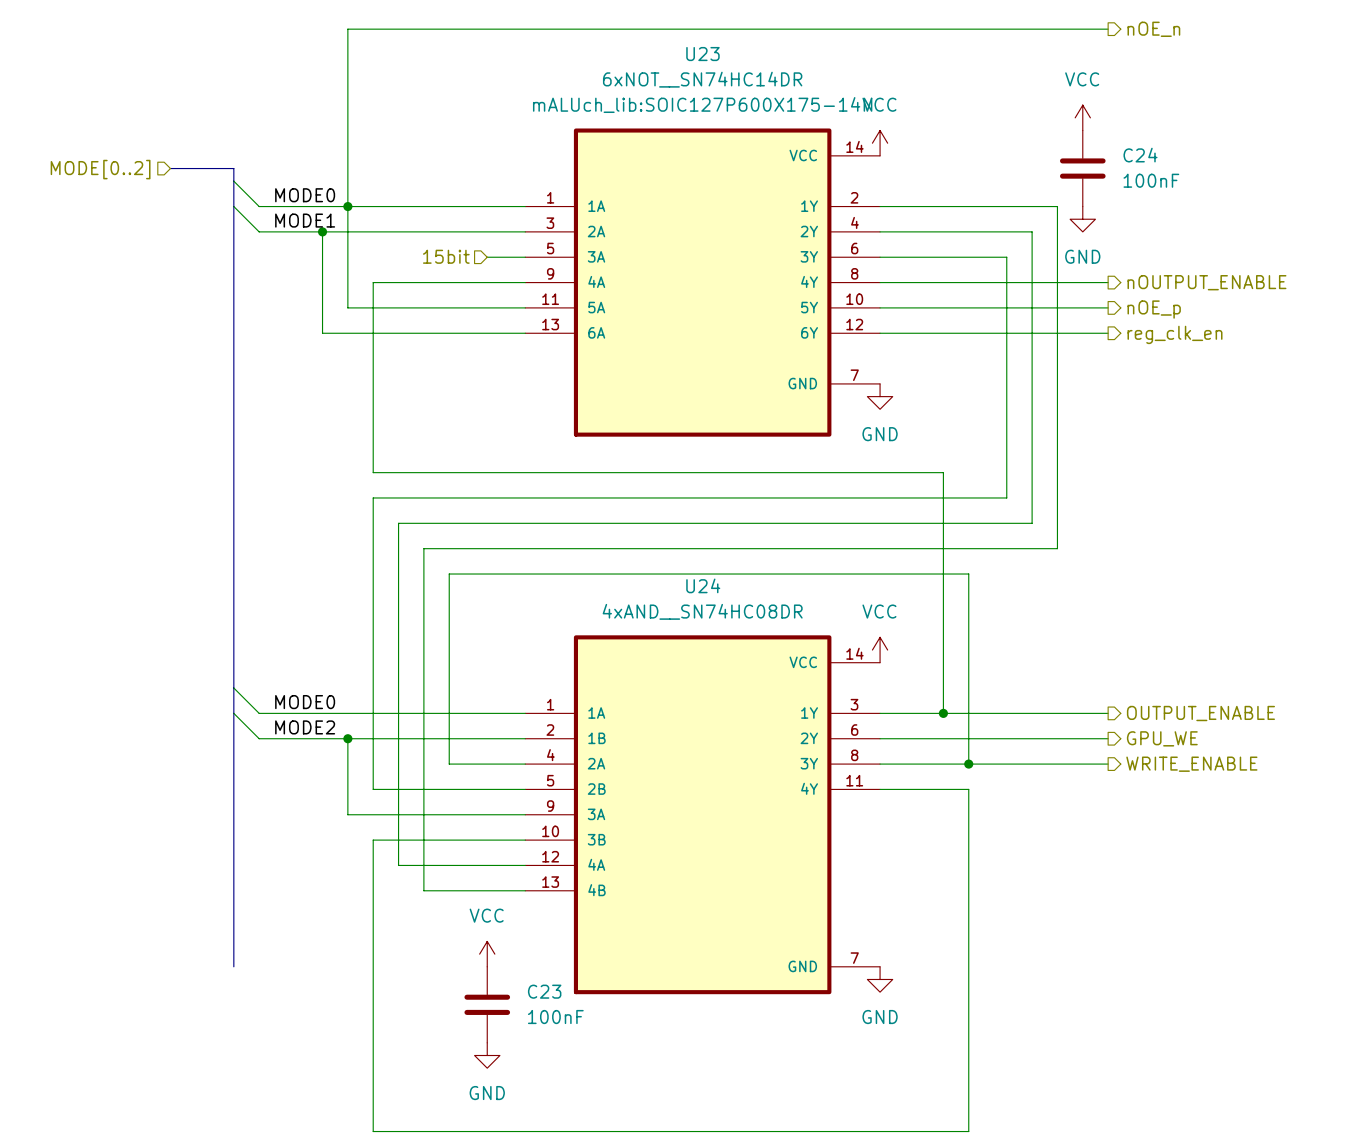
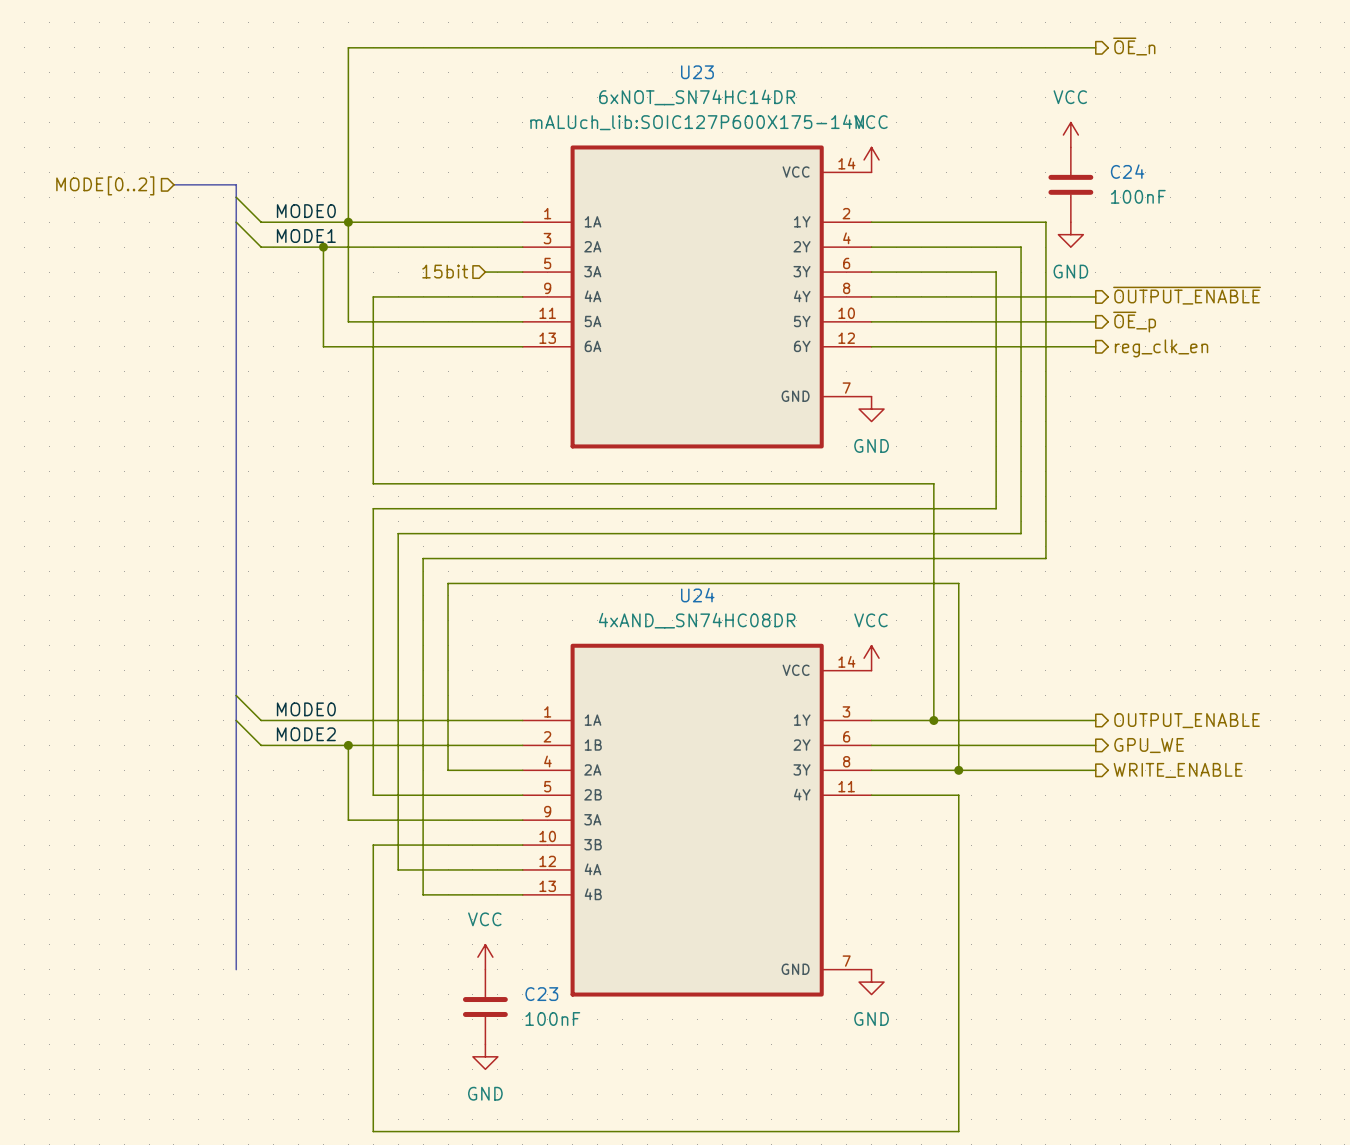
hierarchical label: nOE_n (1153, 29) -> ~{OE}_n (1134, 46)
hierarchical label: nOUTPUT_ENABLE (1206, 282) -> ~{OUTPUT_ENABLE} (1187, 295)
hierarchical label: nOE_p (1154, 309) -> ~{OE}_p (1134, 322)

